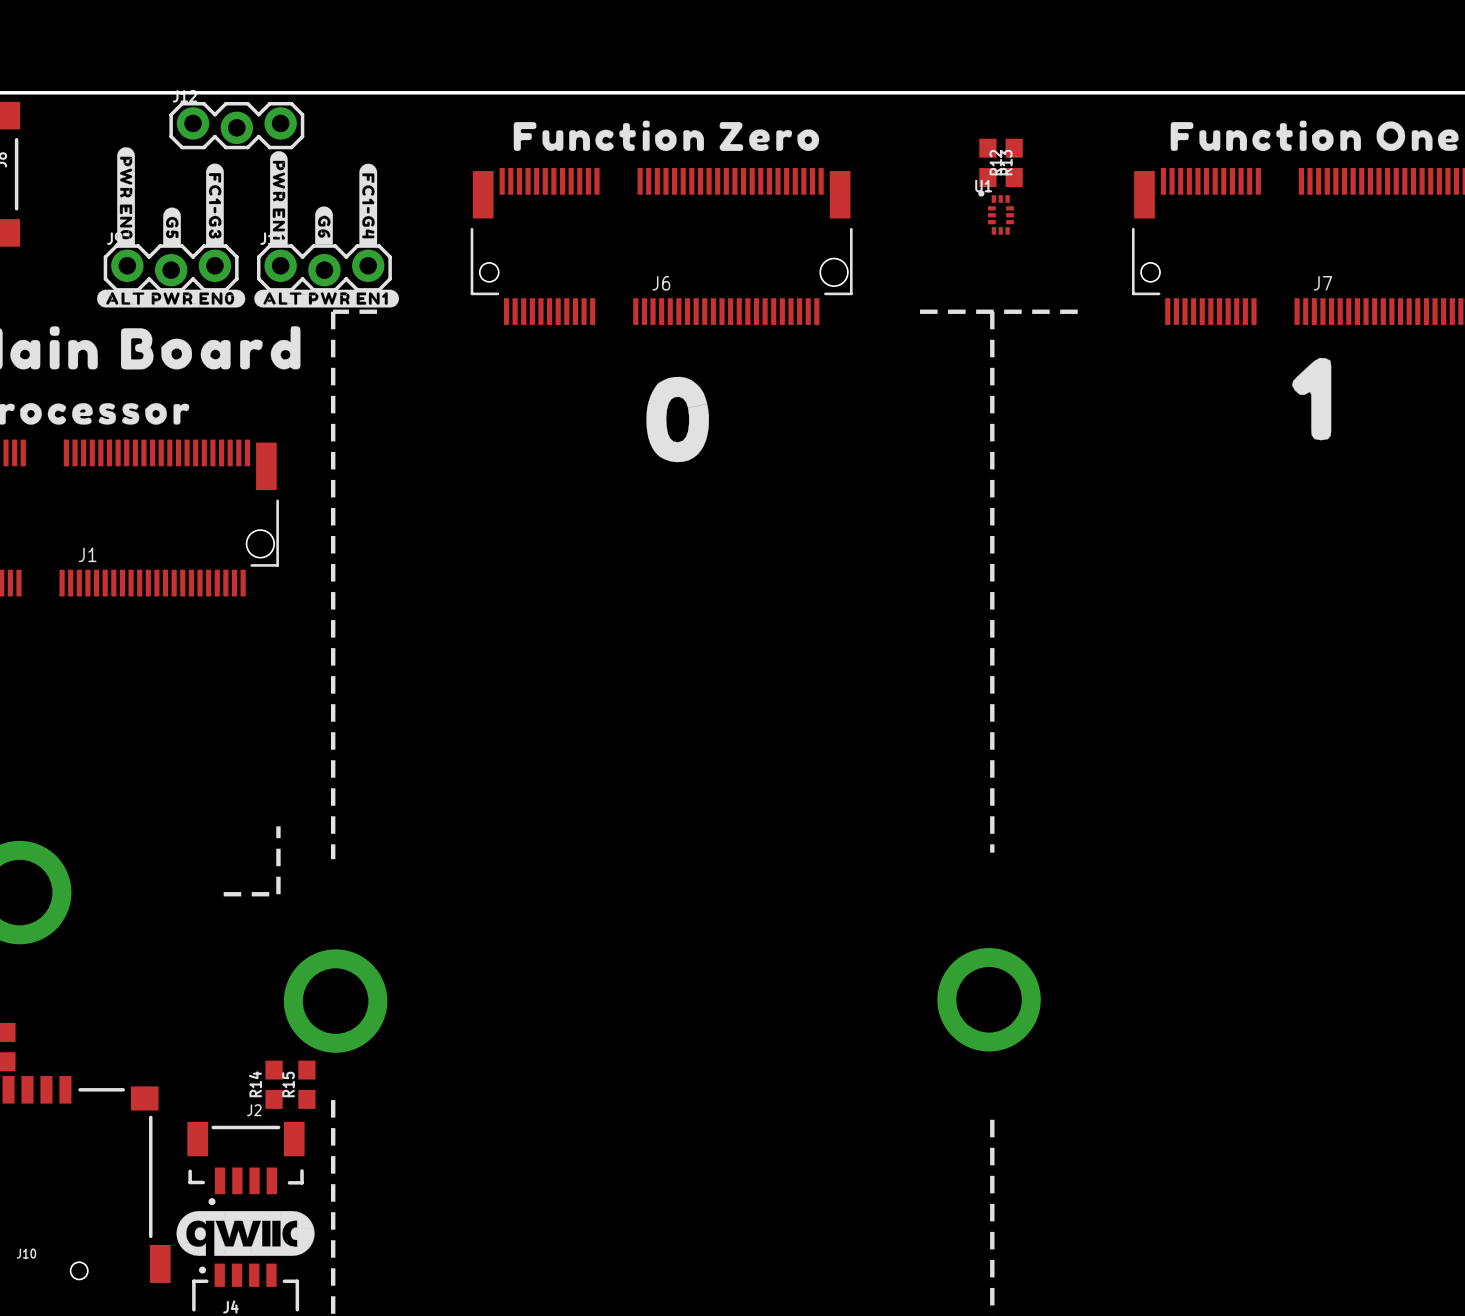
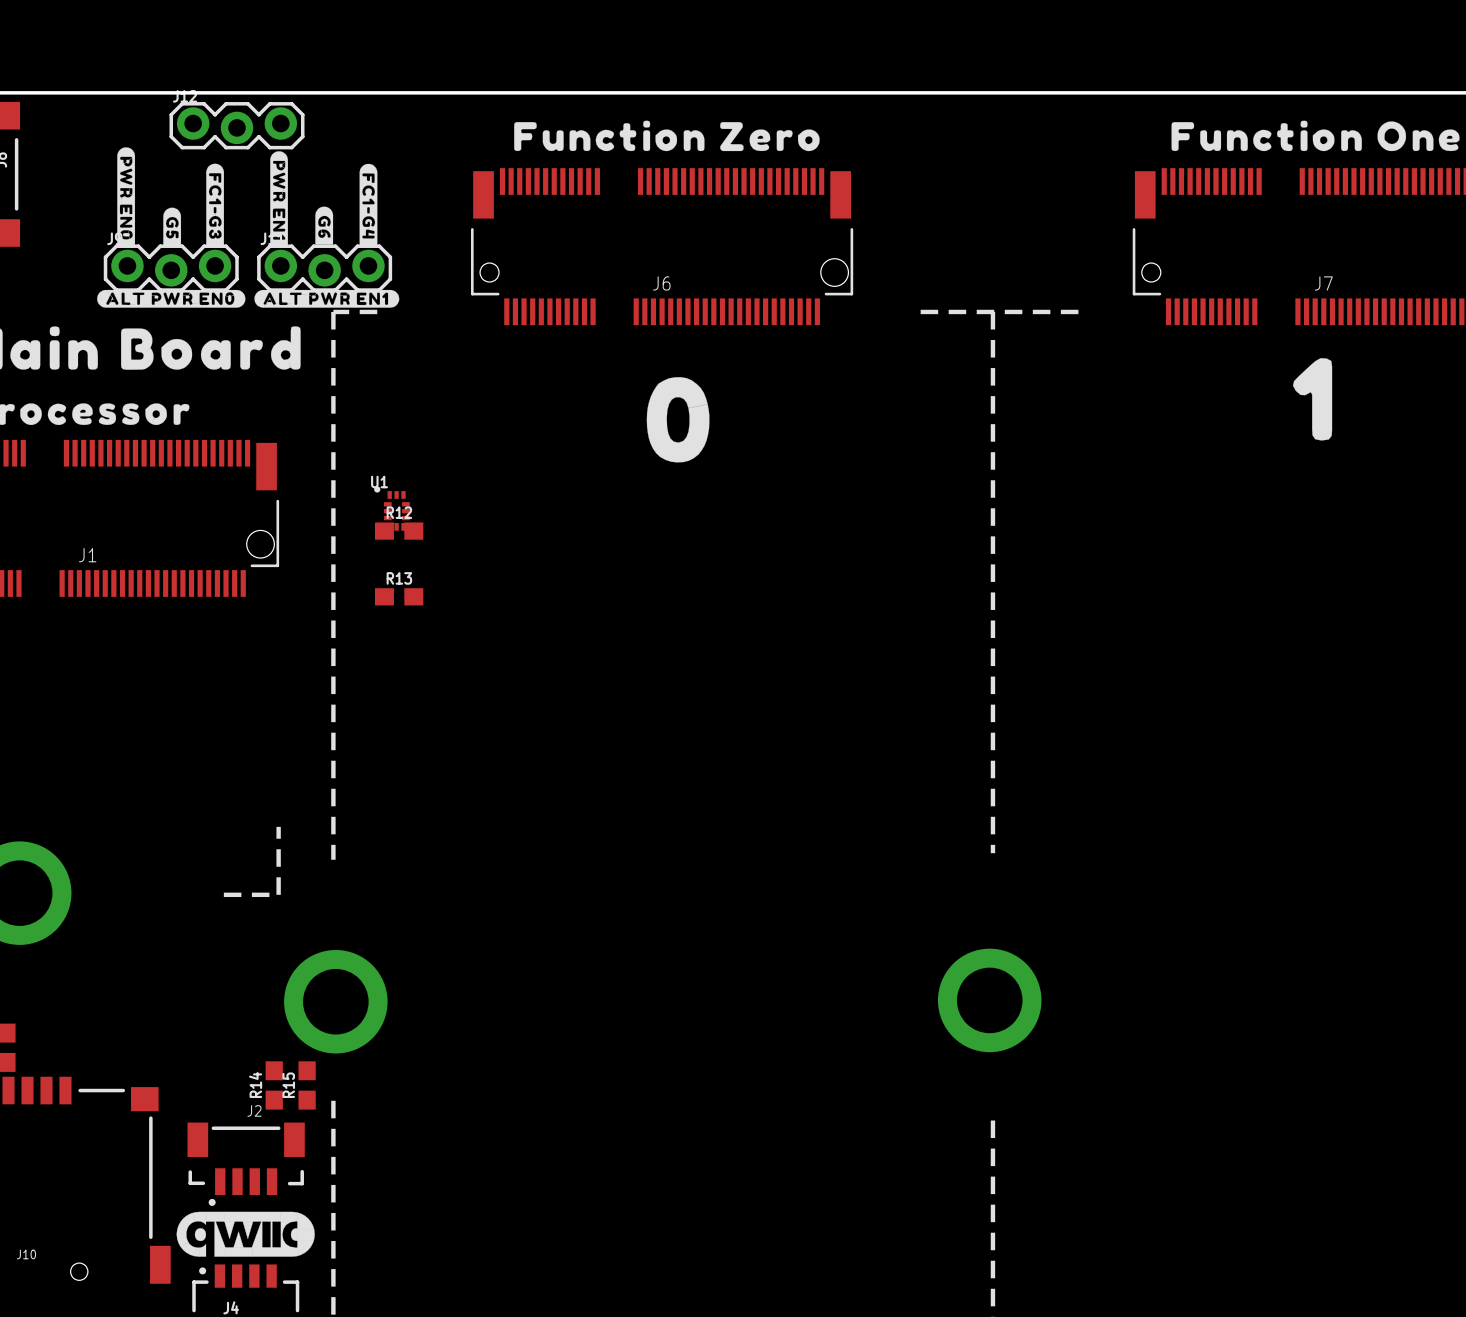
R13 rotation: 0° (987, 162) -> 90° clockwise (399, 596)
R13 position: (987, 162) -> (399, 596)
R12 rotation: 0° (1014, 162) -> 90° clockwise (399, 531)
R12 position: (1014, 162) -> (399, 531)
U1 position: (996, 212) -> (391, 508)

